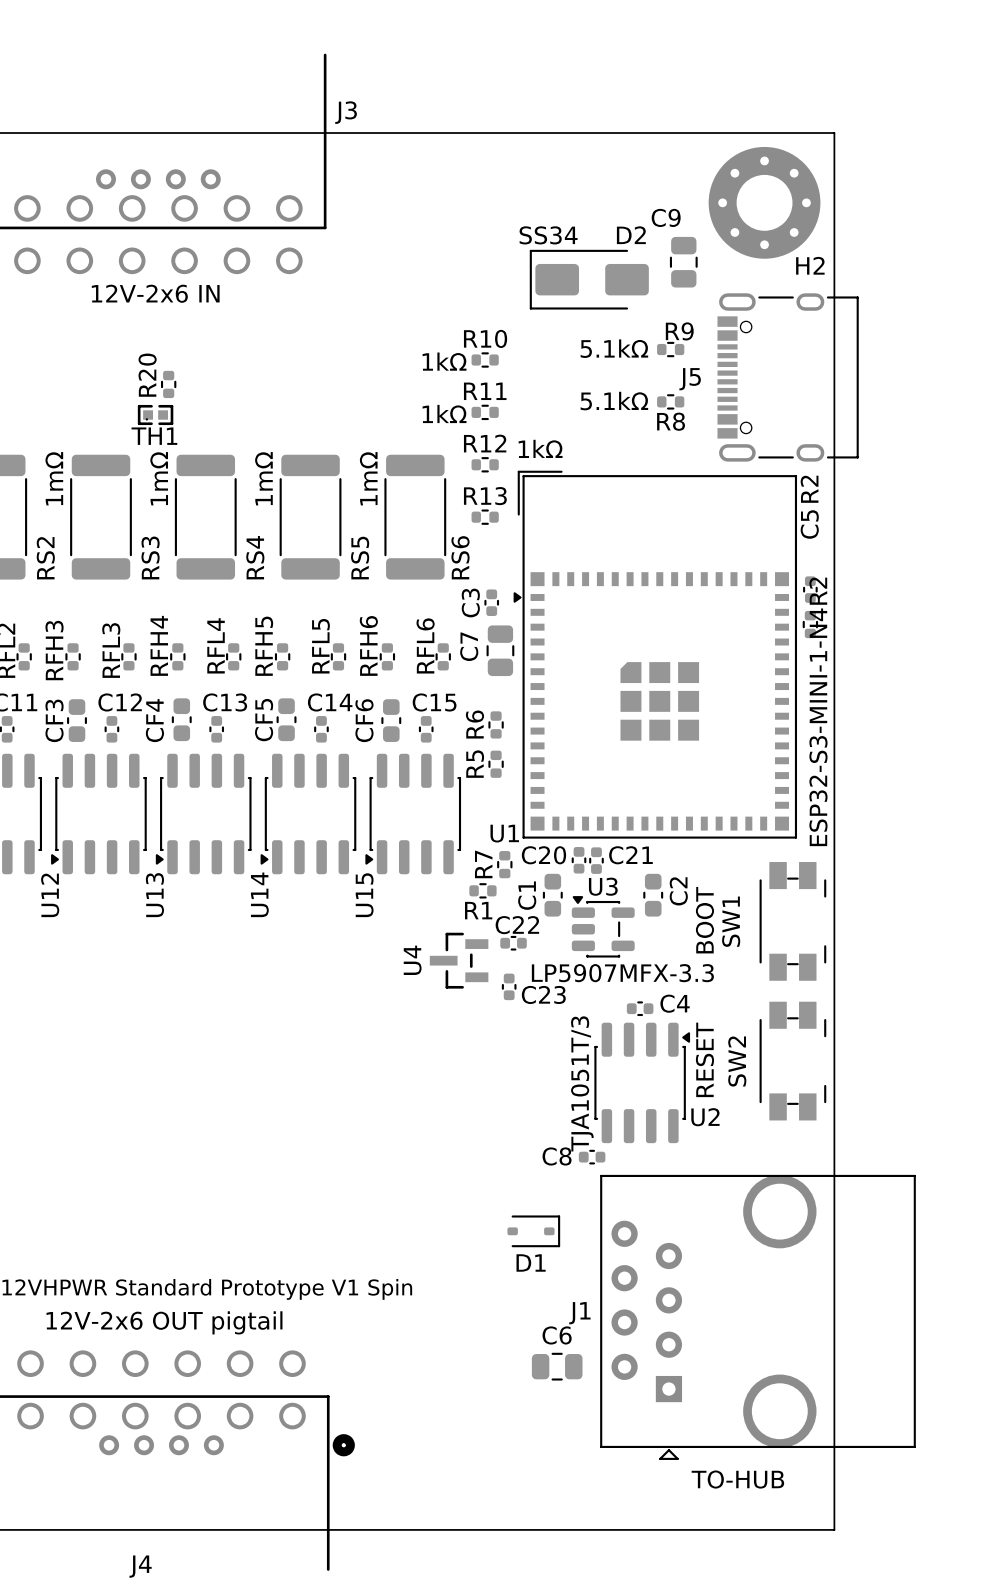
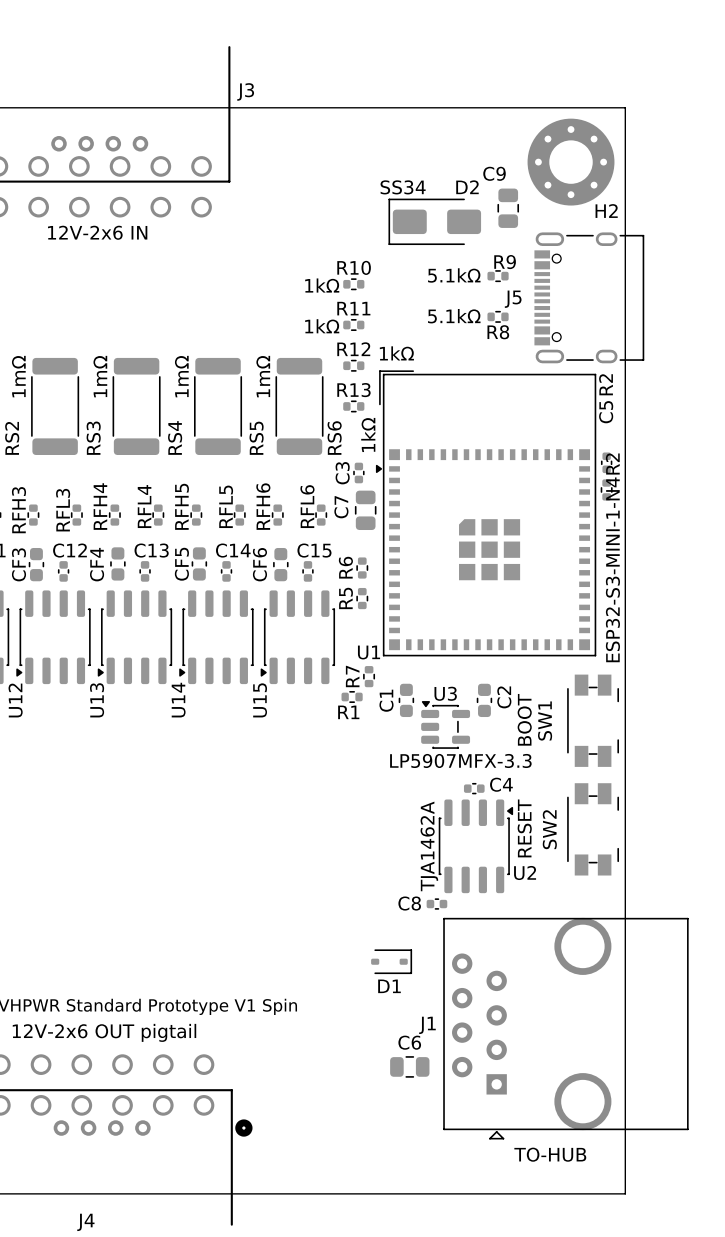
R20: (168, 384) -> none
TH1: (155, 415) -> none
R13 value: none -> 1kΩ (368, 434)
C20: (579, 860) -> none
C21: (596, 860) -> none
C22: (513, 943) -> none
U4: (459, 960) -> none
C23: (509, 986) -> none
U2 value: TJA1051T/3 (582, 1083) -> TJA1462A (429, 846)

